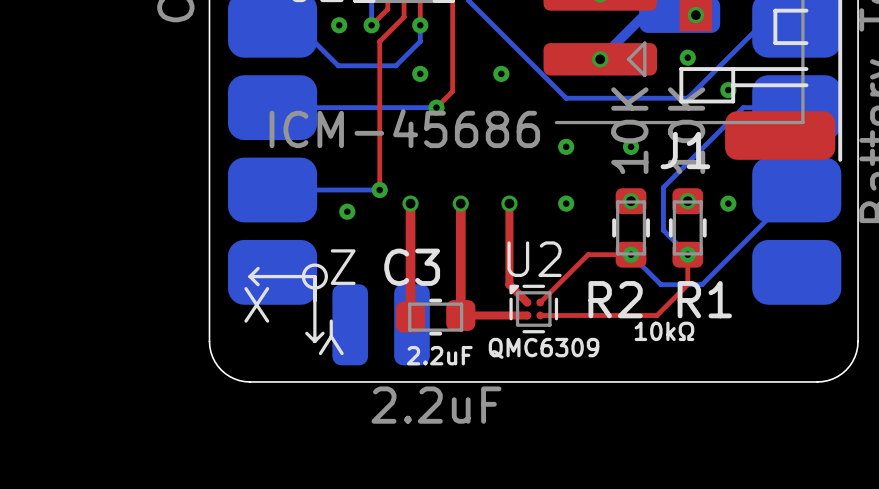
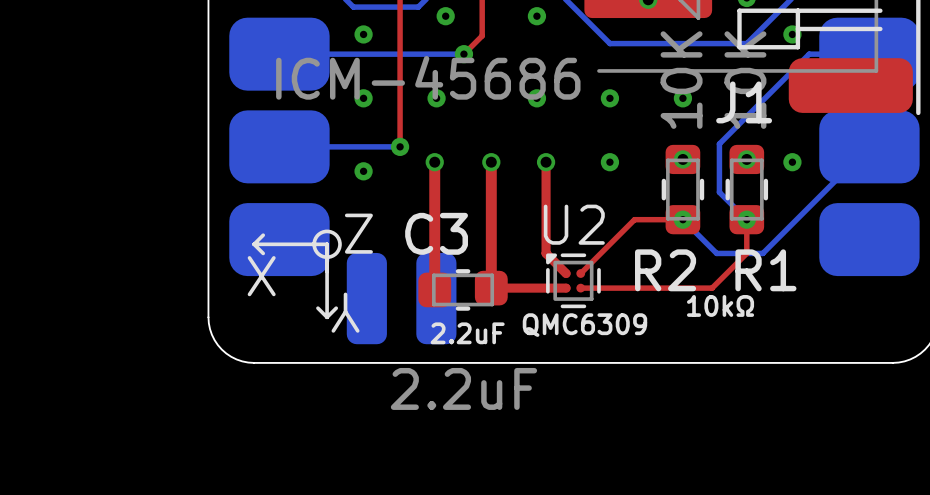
via: none -> (363, 34)
via: none -> (363, 98)
via: none -> (436, 98)
via: none -> (536, 98)

